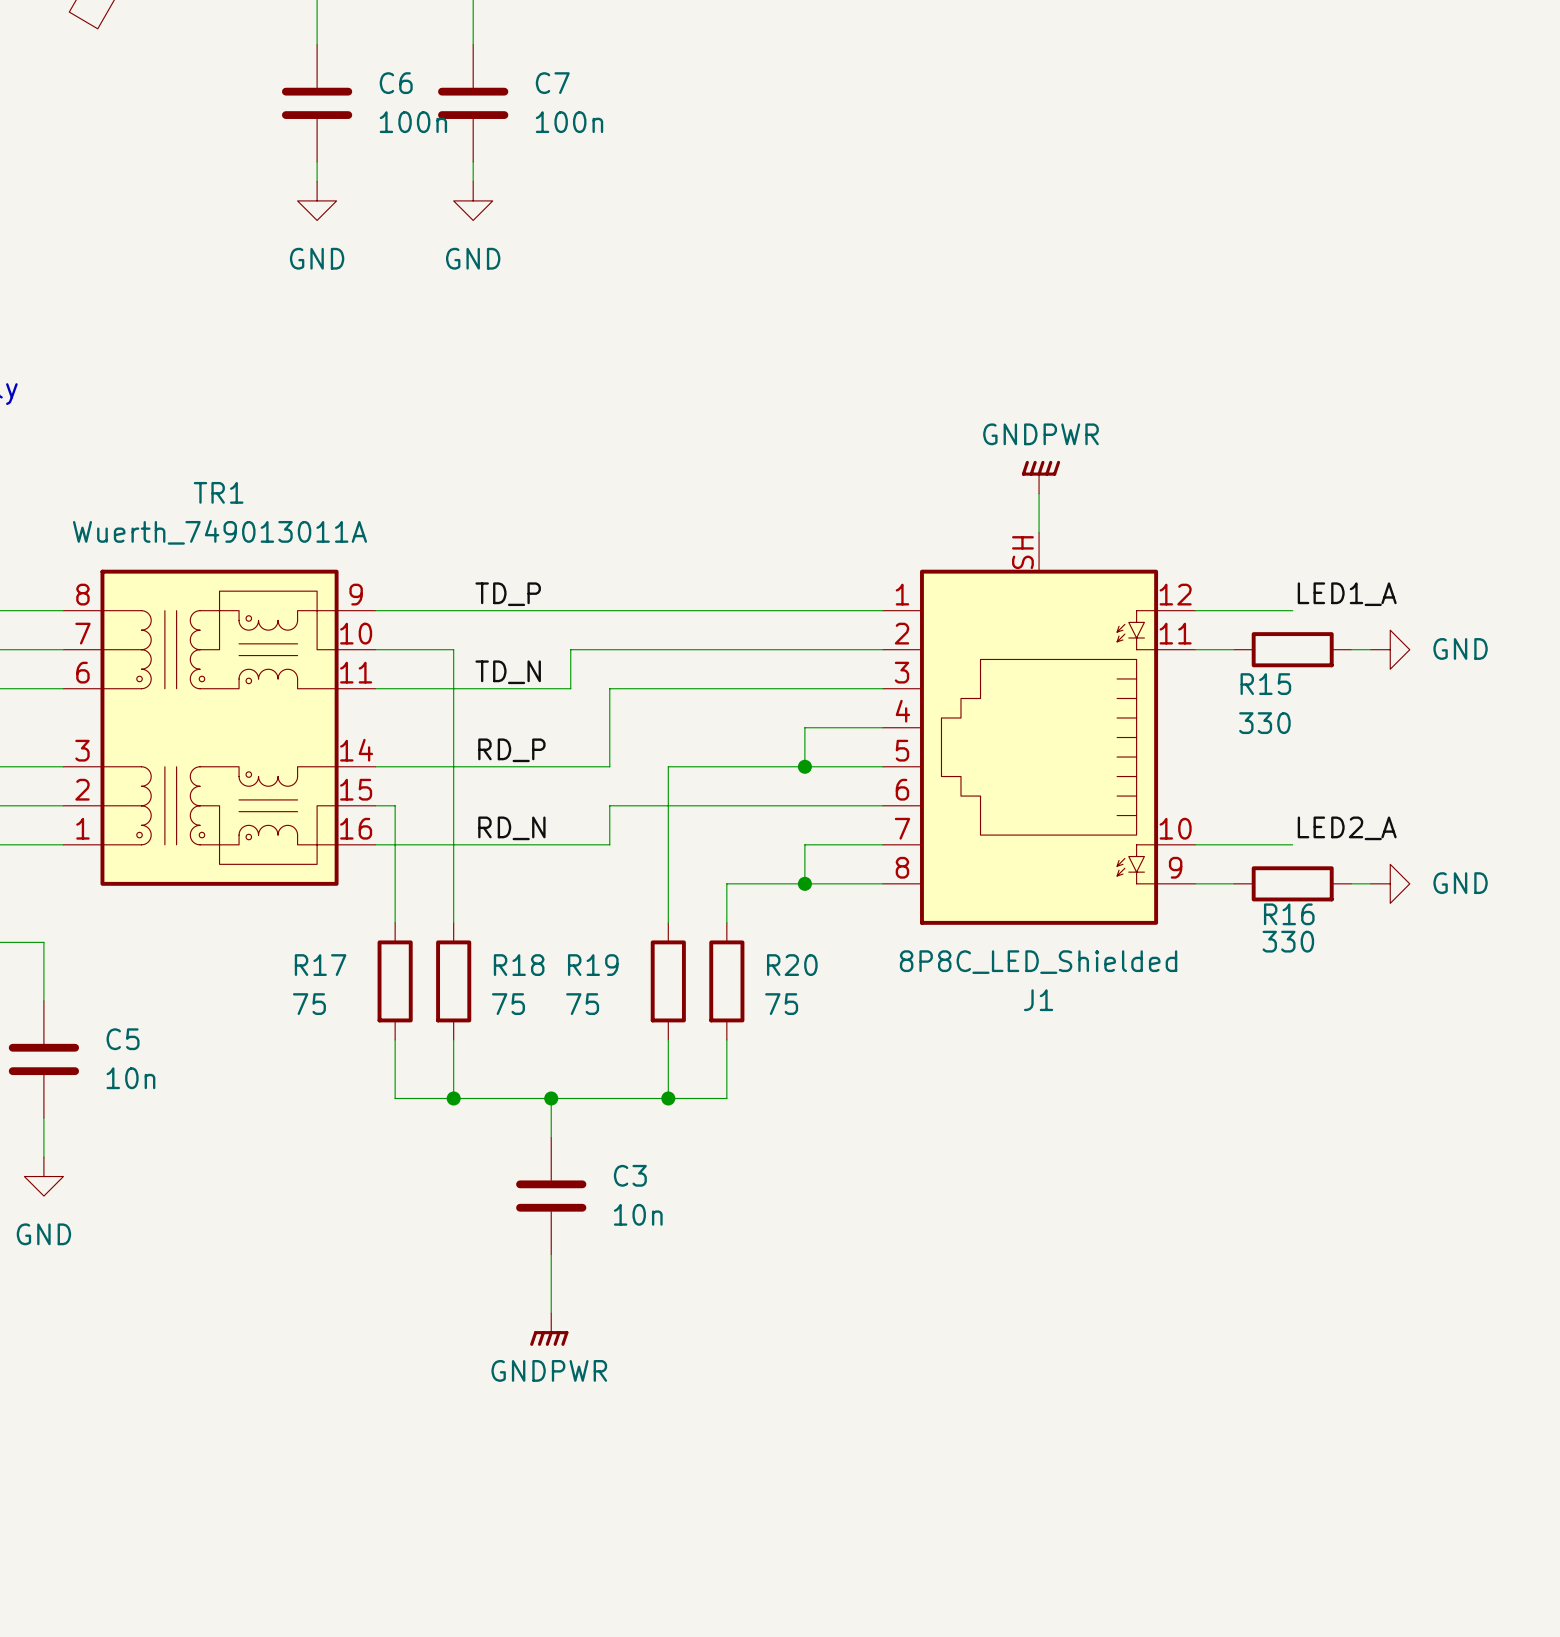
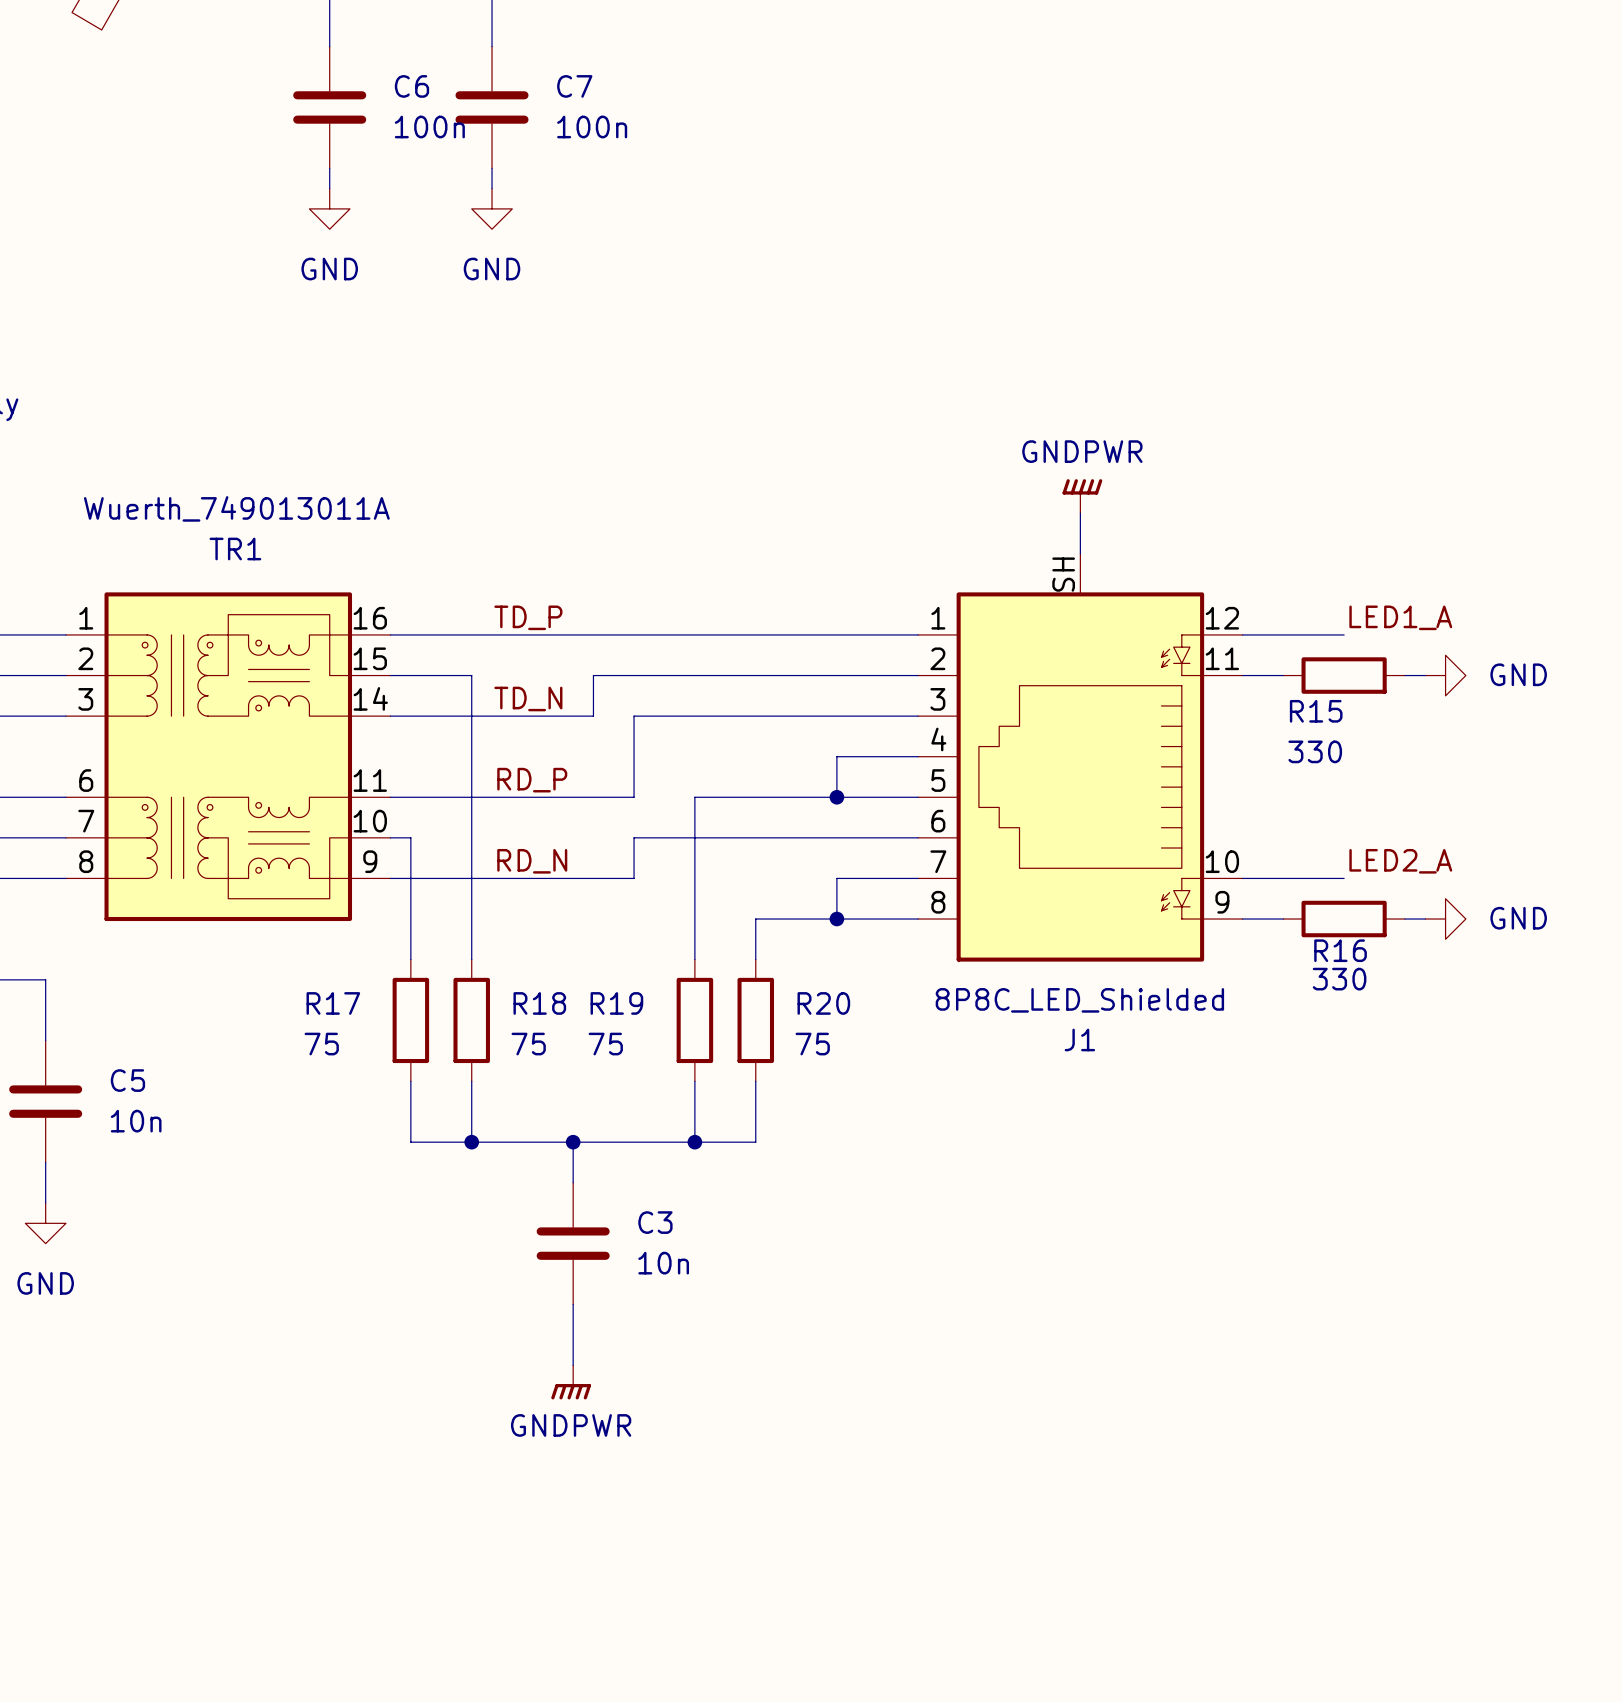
TR1 name position: TR1 (218, 492) -> TR1 (235, 549)
TR1 value position: Wuerth_749013011A (219, 532) -> Wuerth_749013011A (236, 508)
TR1 flip: as is (219, 727) -> up-down (228, 756)

